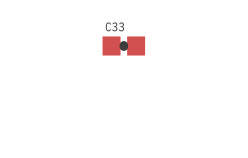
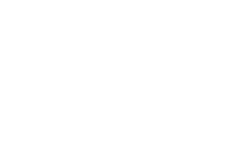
C33: (123, 45) -> none

